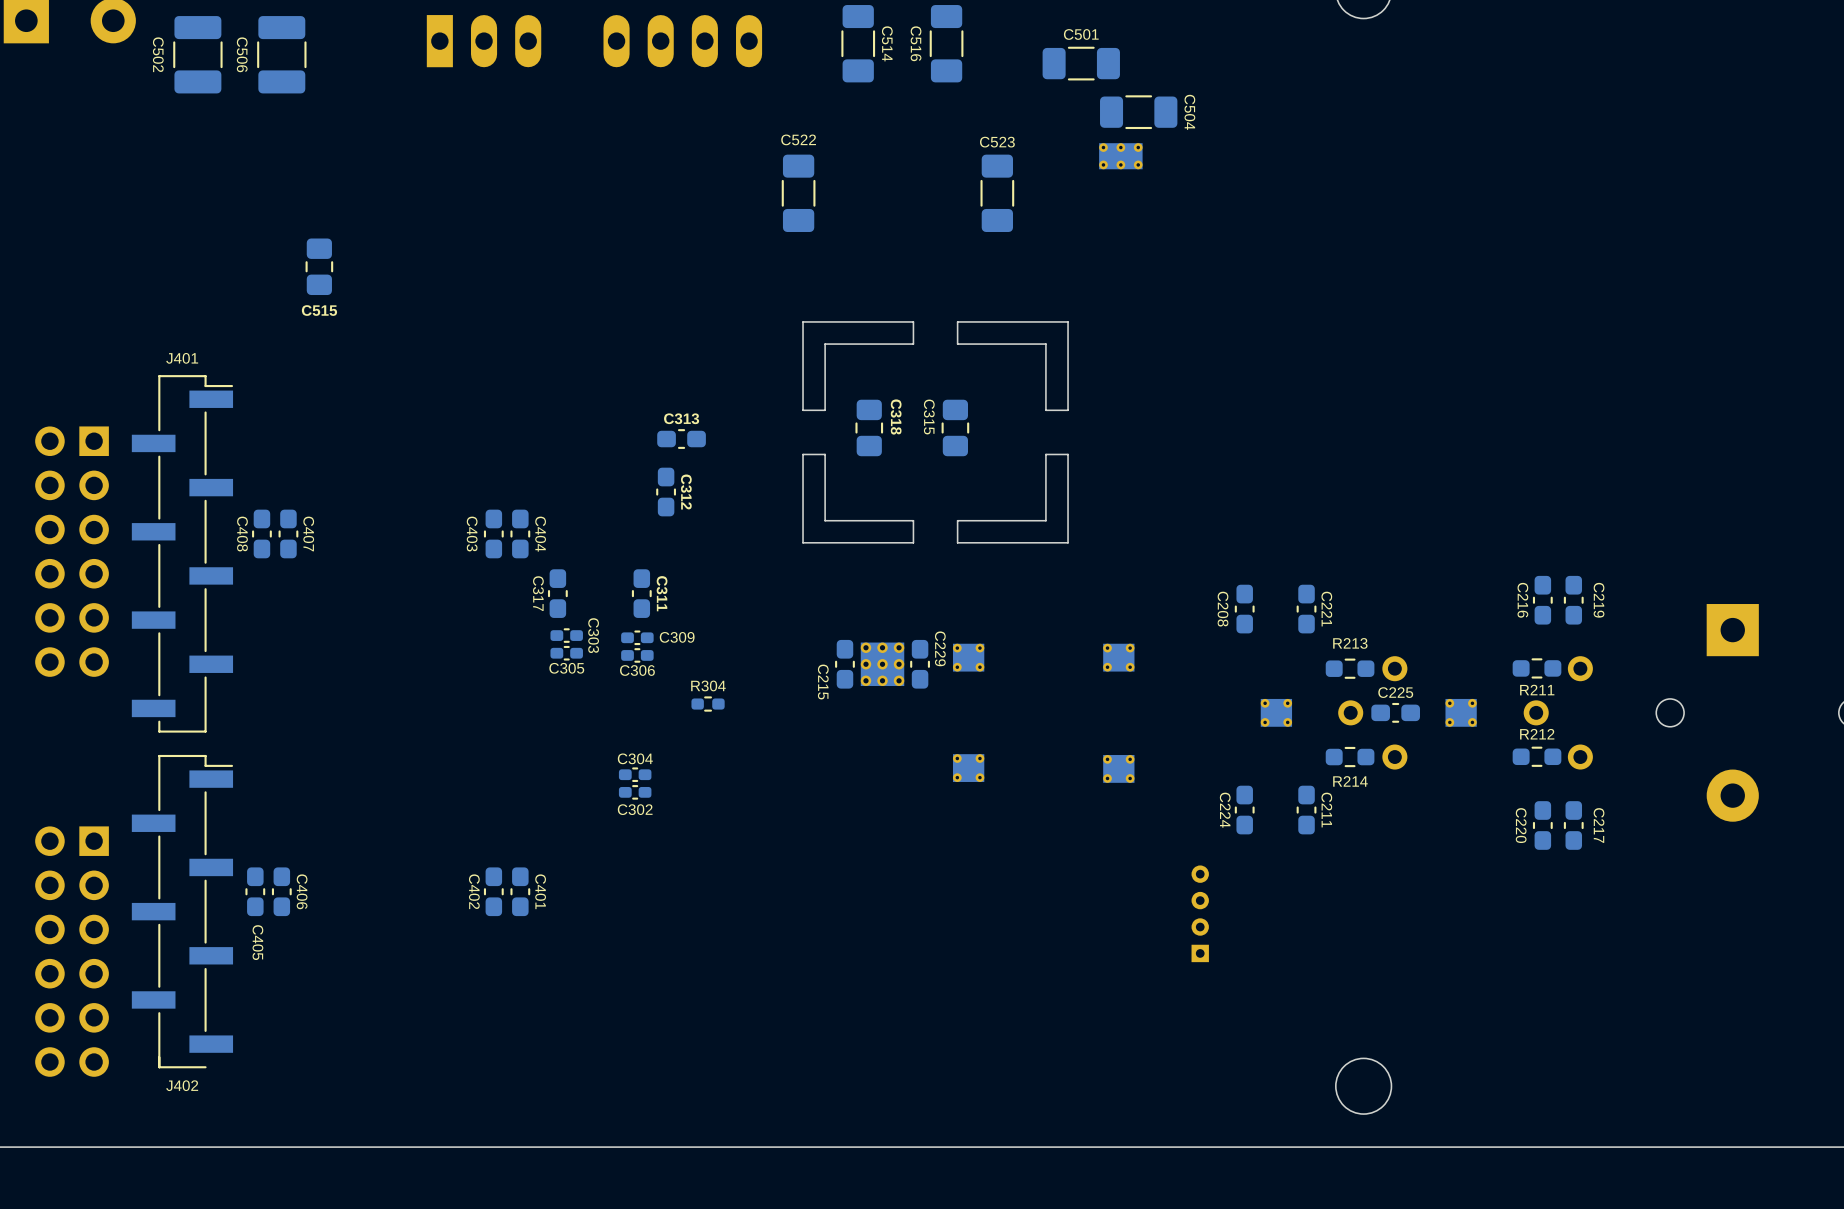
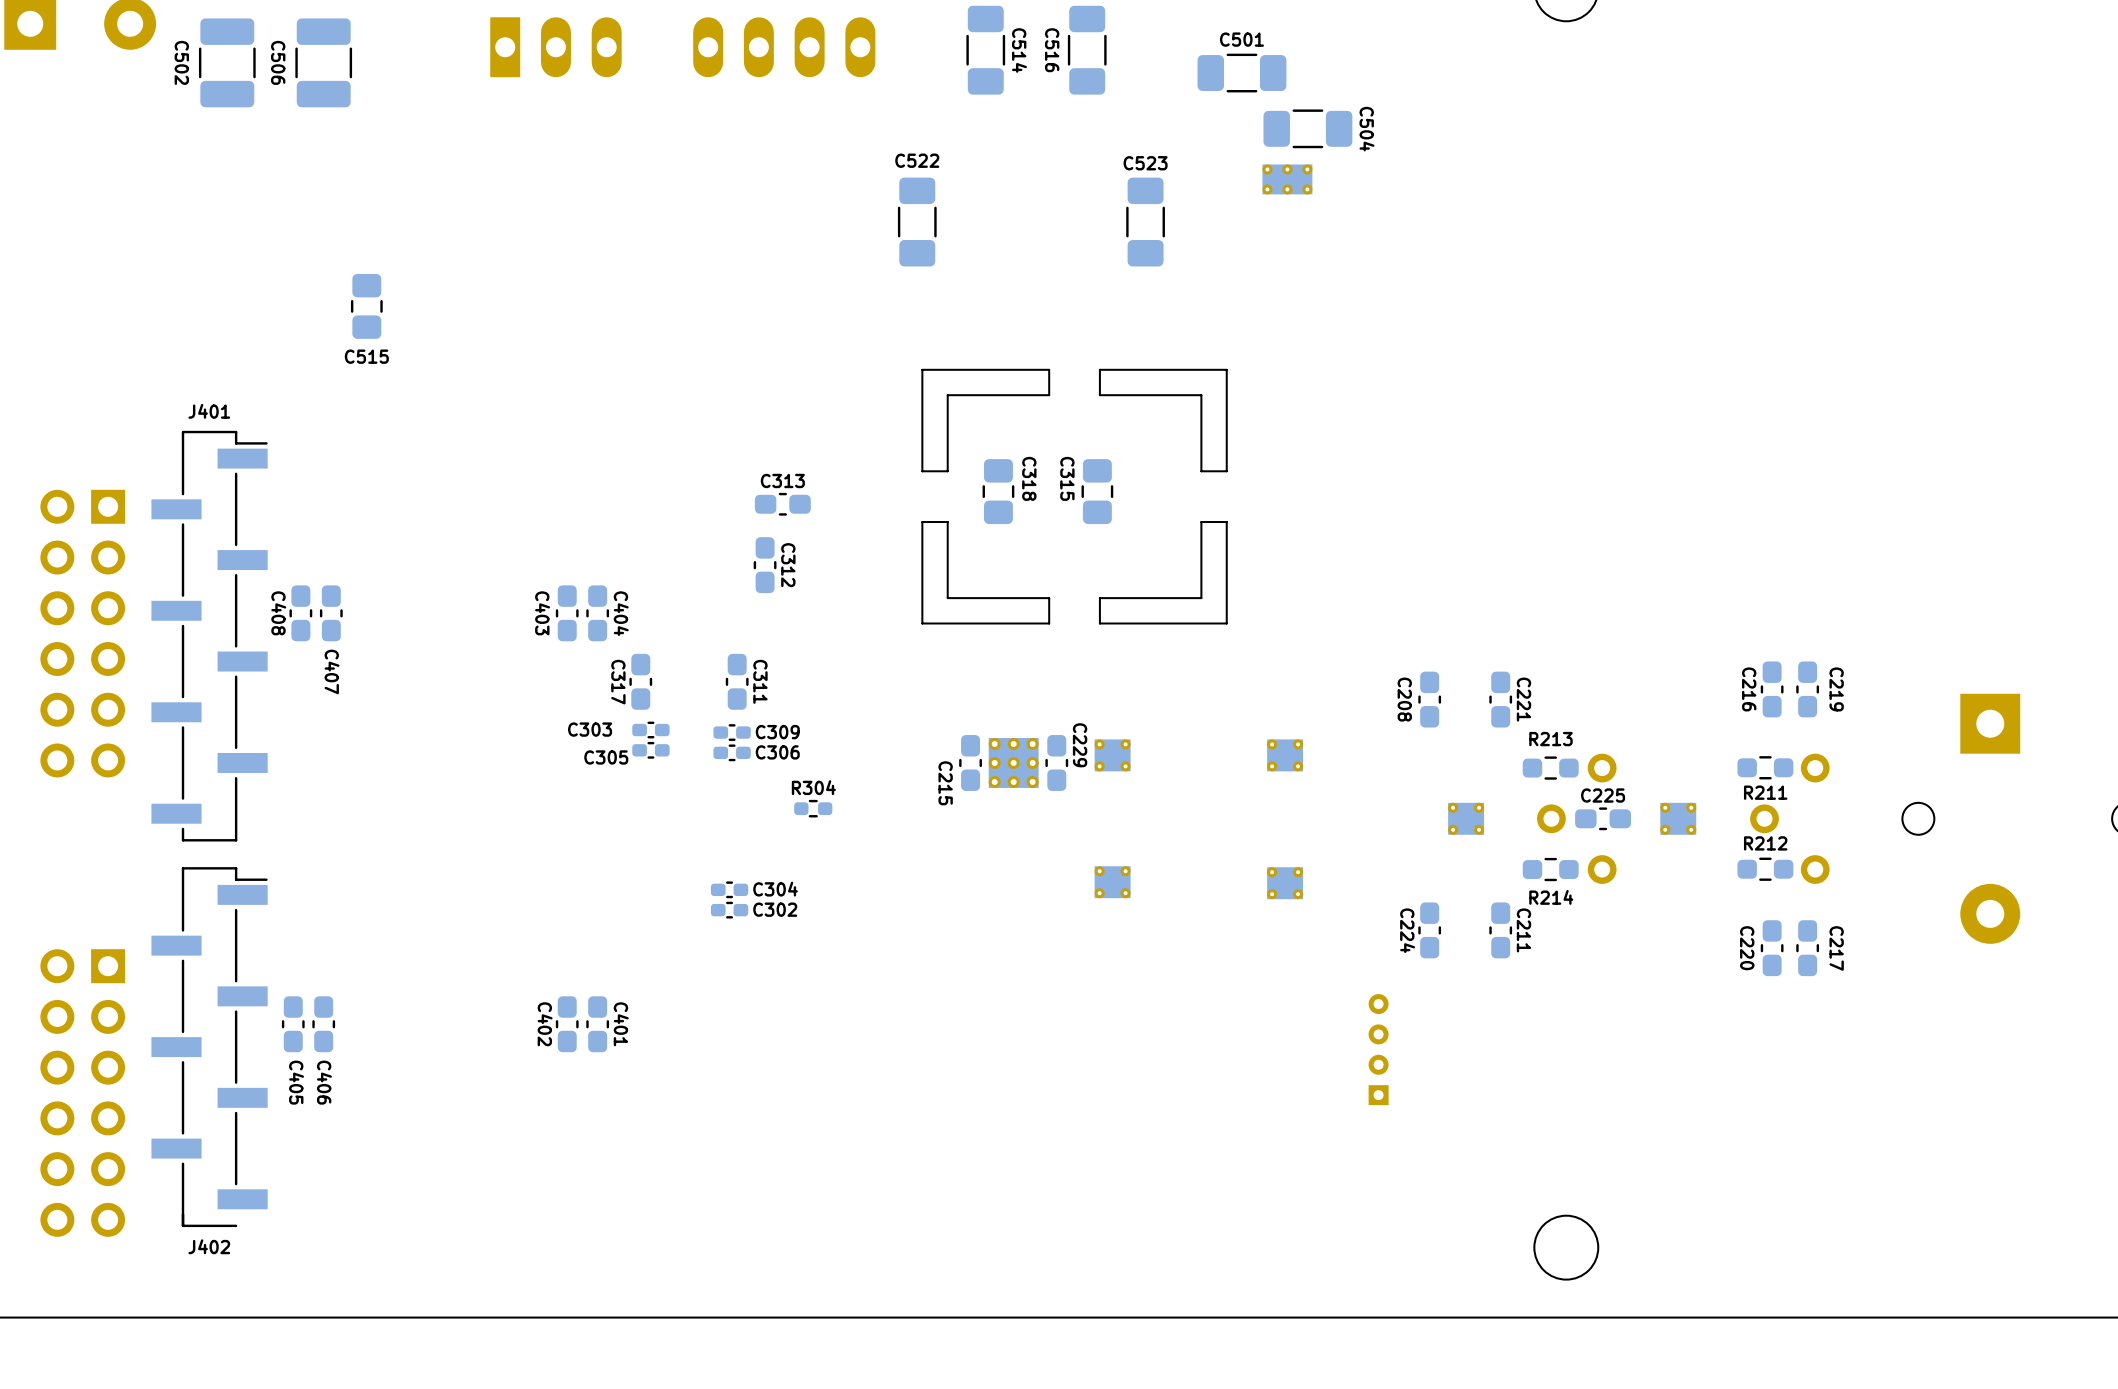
C407 name position: C407 (308, 533) -> C407 (332, 671)
C303 name rotation: 0° (593, 635) -> 90° counterclockwise (590, 729)
C303 name position: C303 (593, 635) -> C303 (590, 729)
C305 name position: C305 (566, 668) -> C305 (606, 757)
C306 name position: C306 (637, 670) -> C306 (777, 752)
C304 name position: C304 (635, 758) -> C304 (775, 889)
C302 name position: C302 (635, 809) -> C302 (775, 909)
C406 name position: C406 (302, 891) -> C406 (324, 1082)

